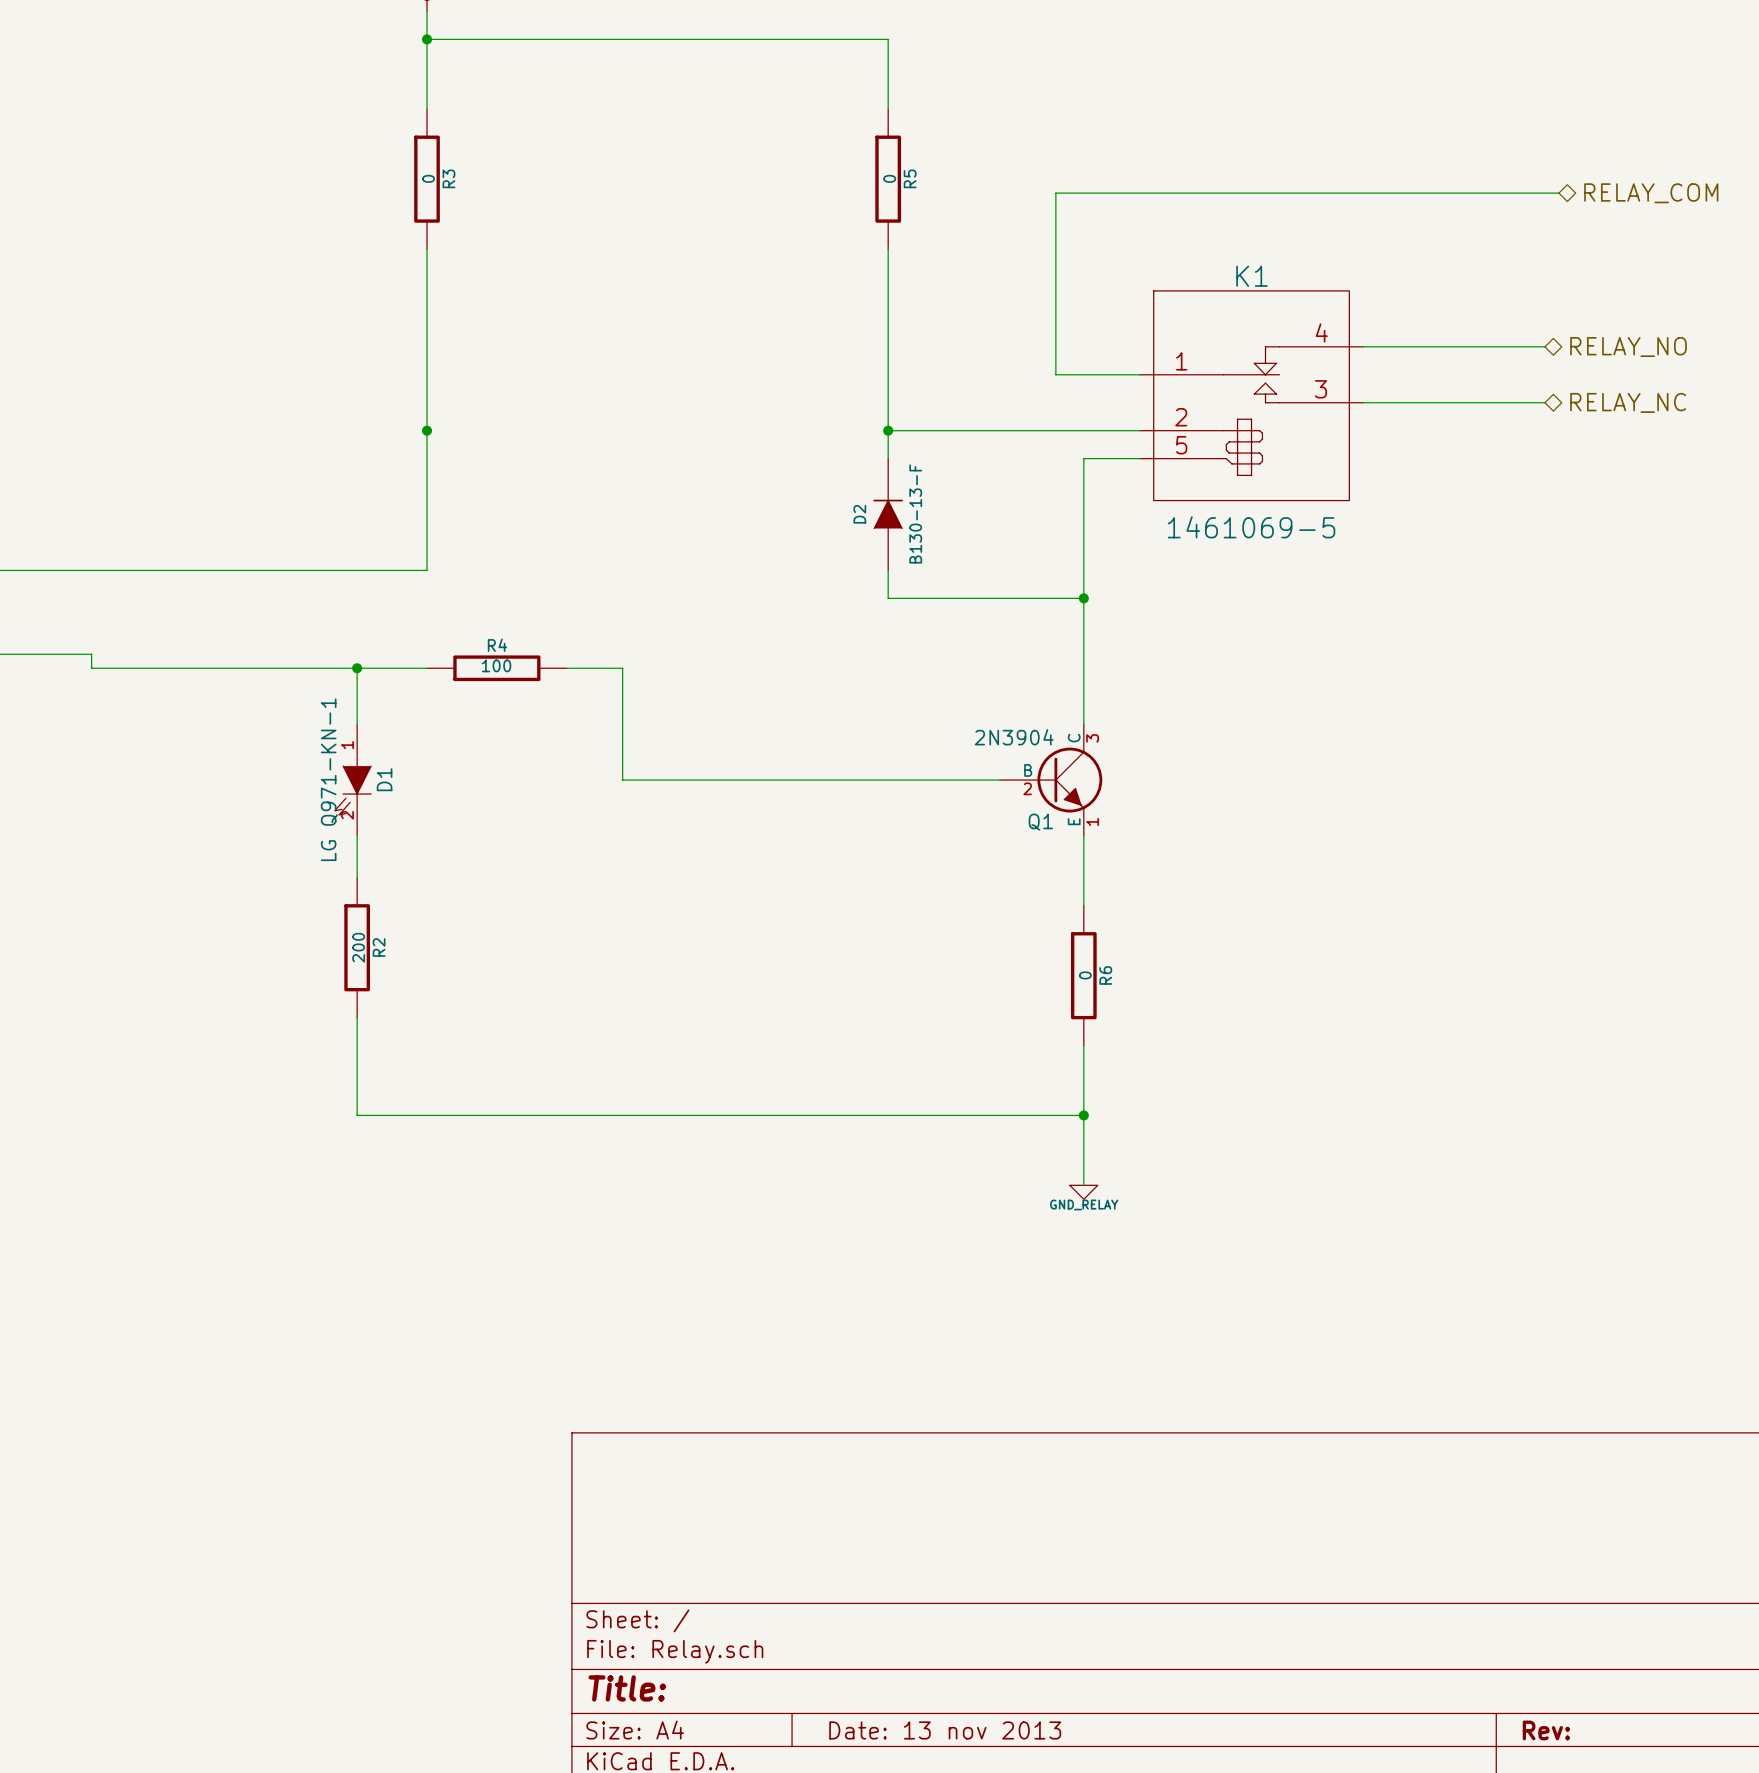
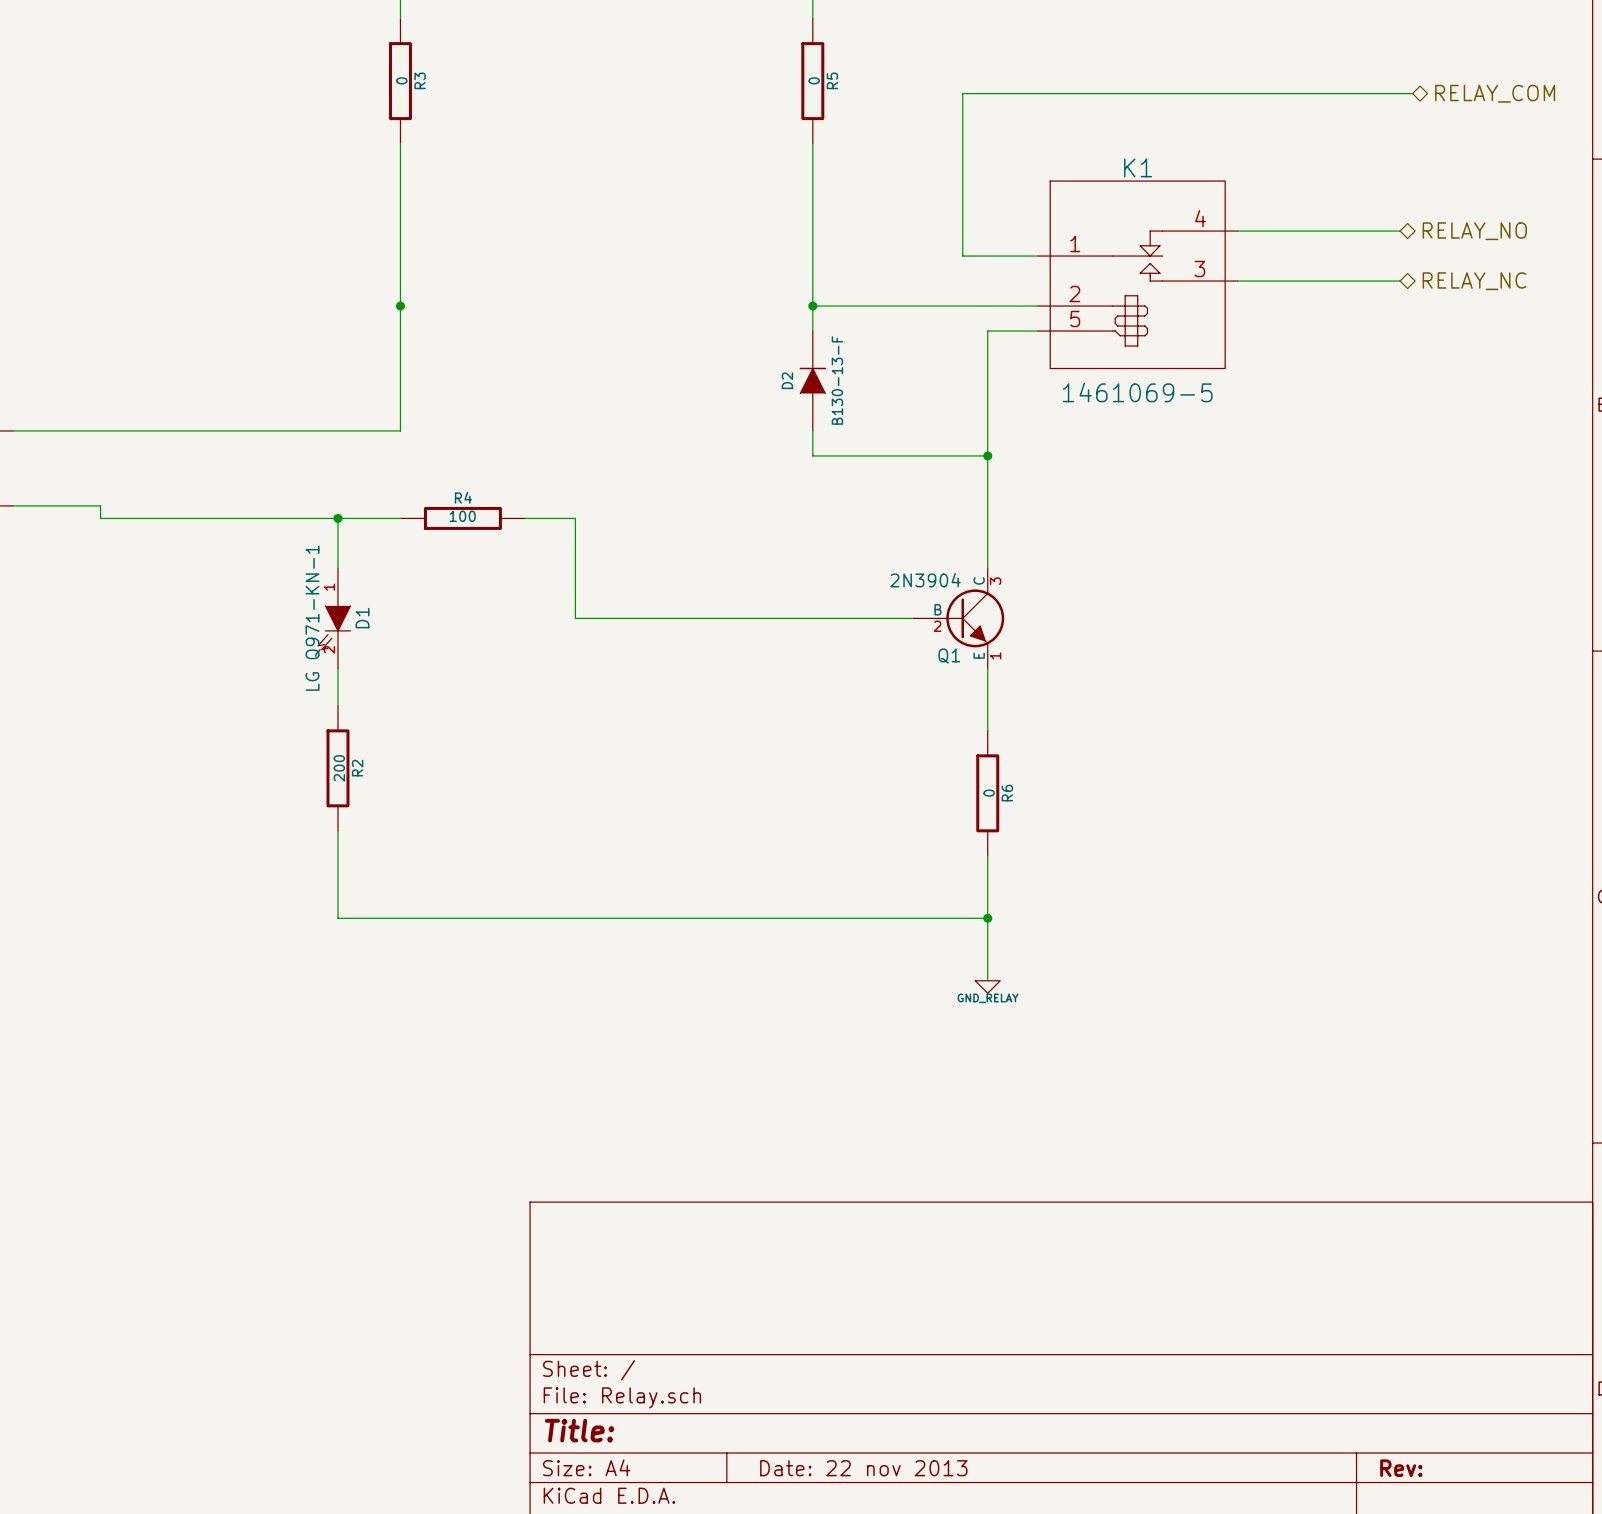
title block: Date: 13 nov 2013 (945, 1730) -> Date: 22 nov 2013 (863, 1468)

